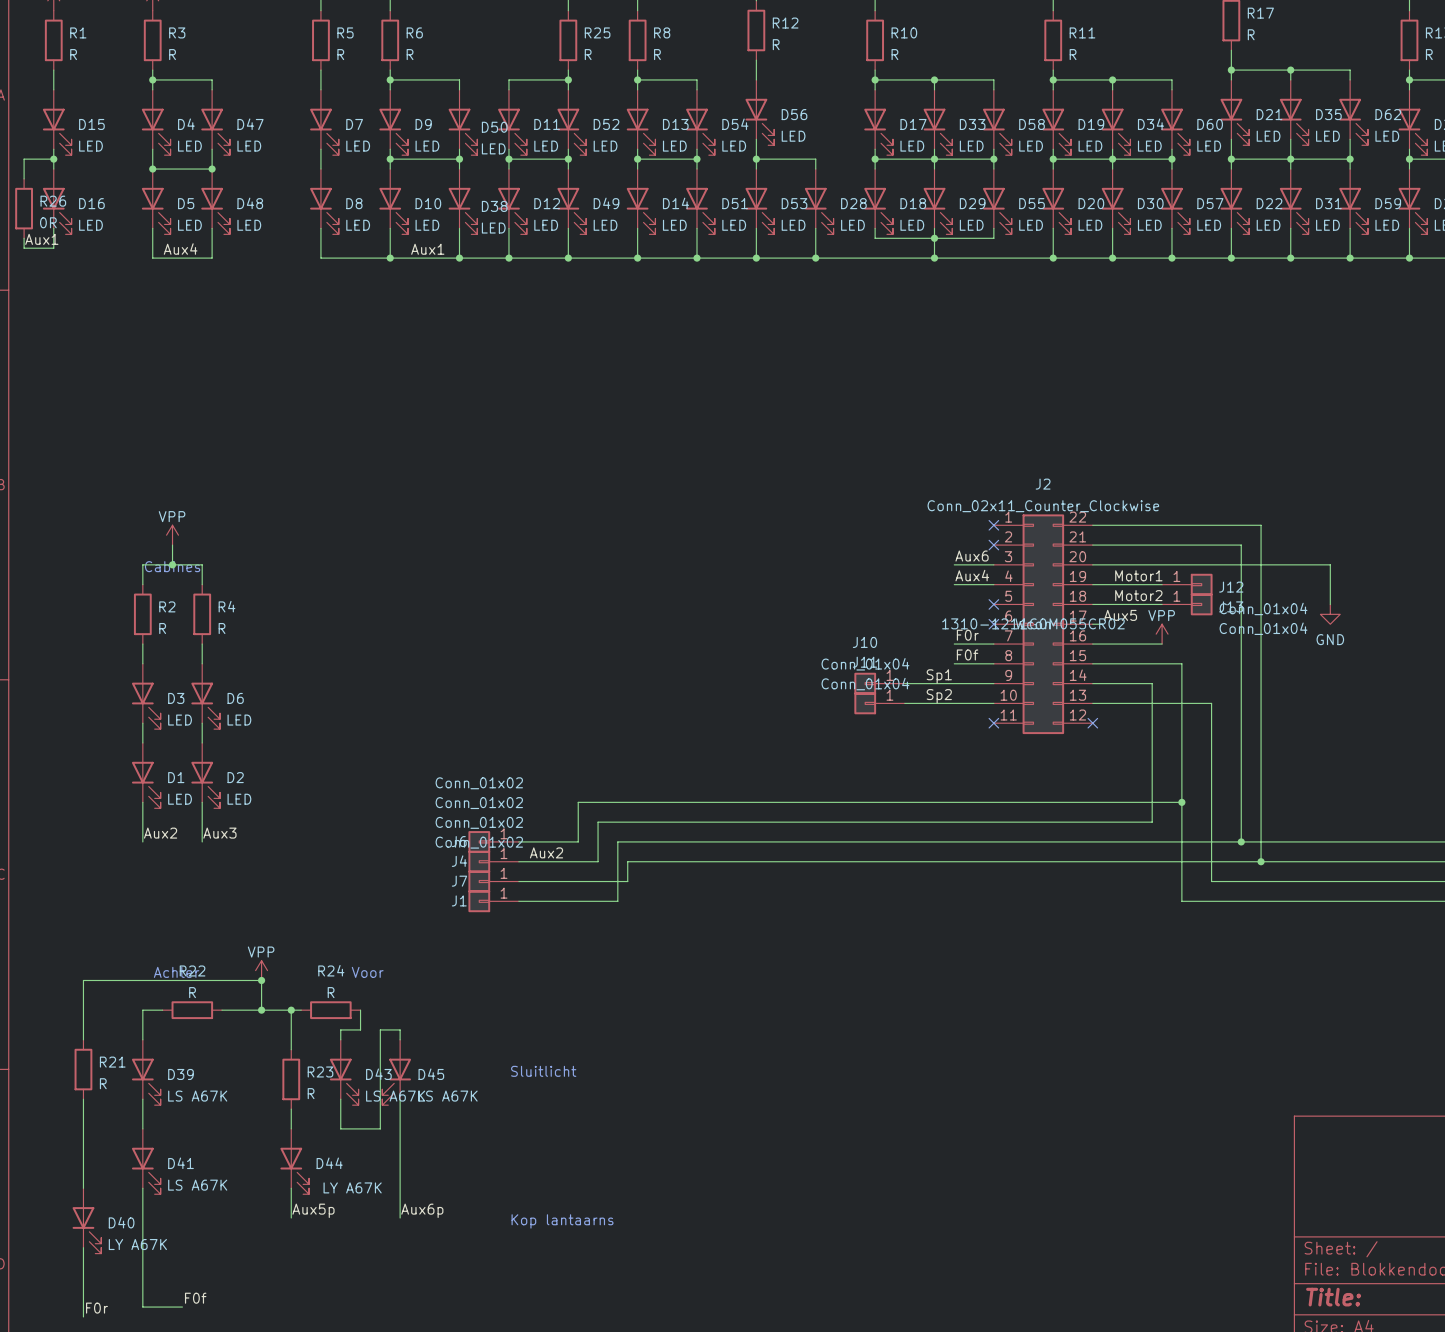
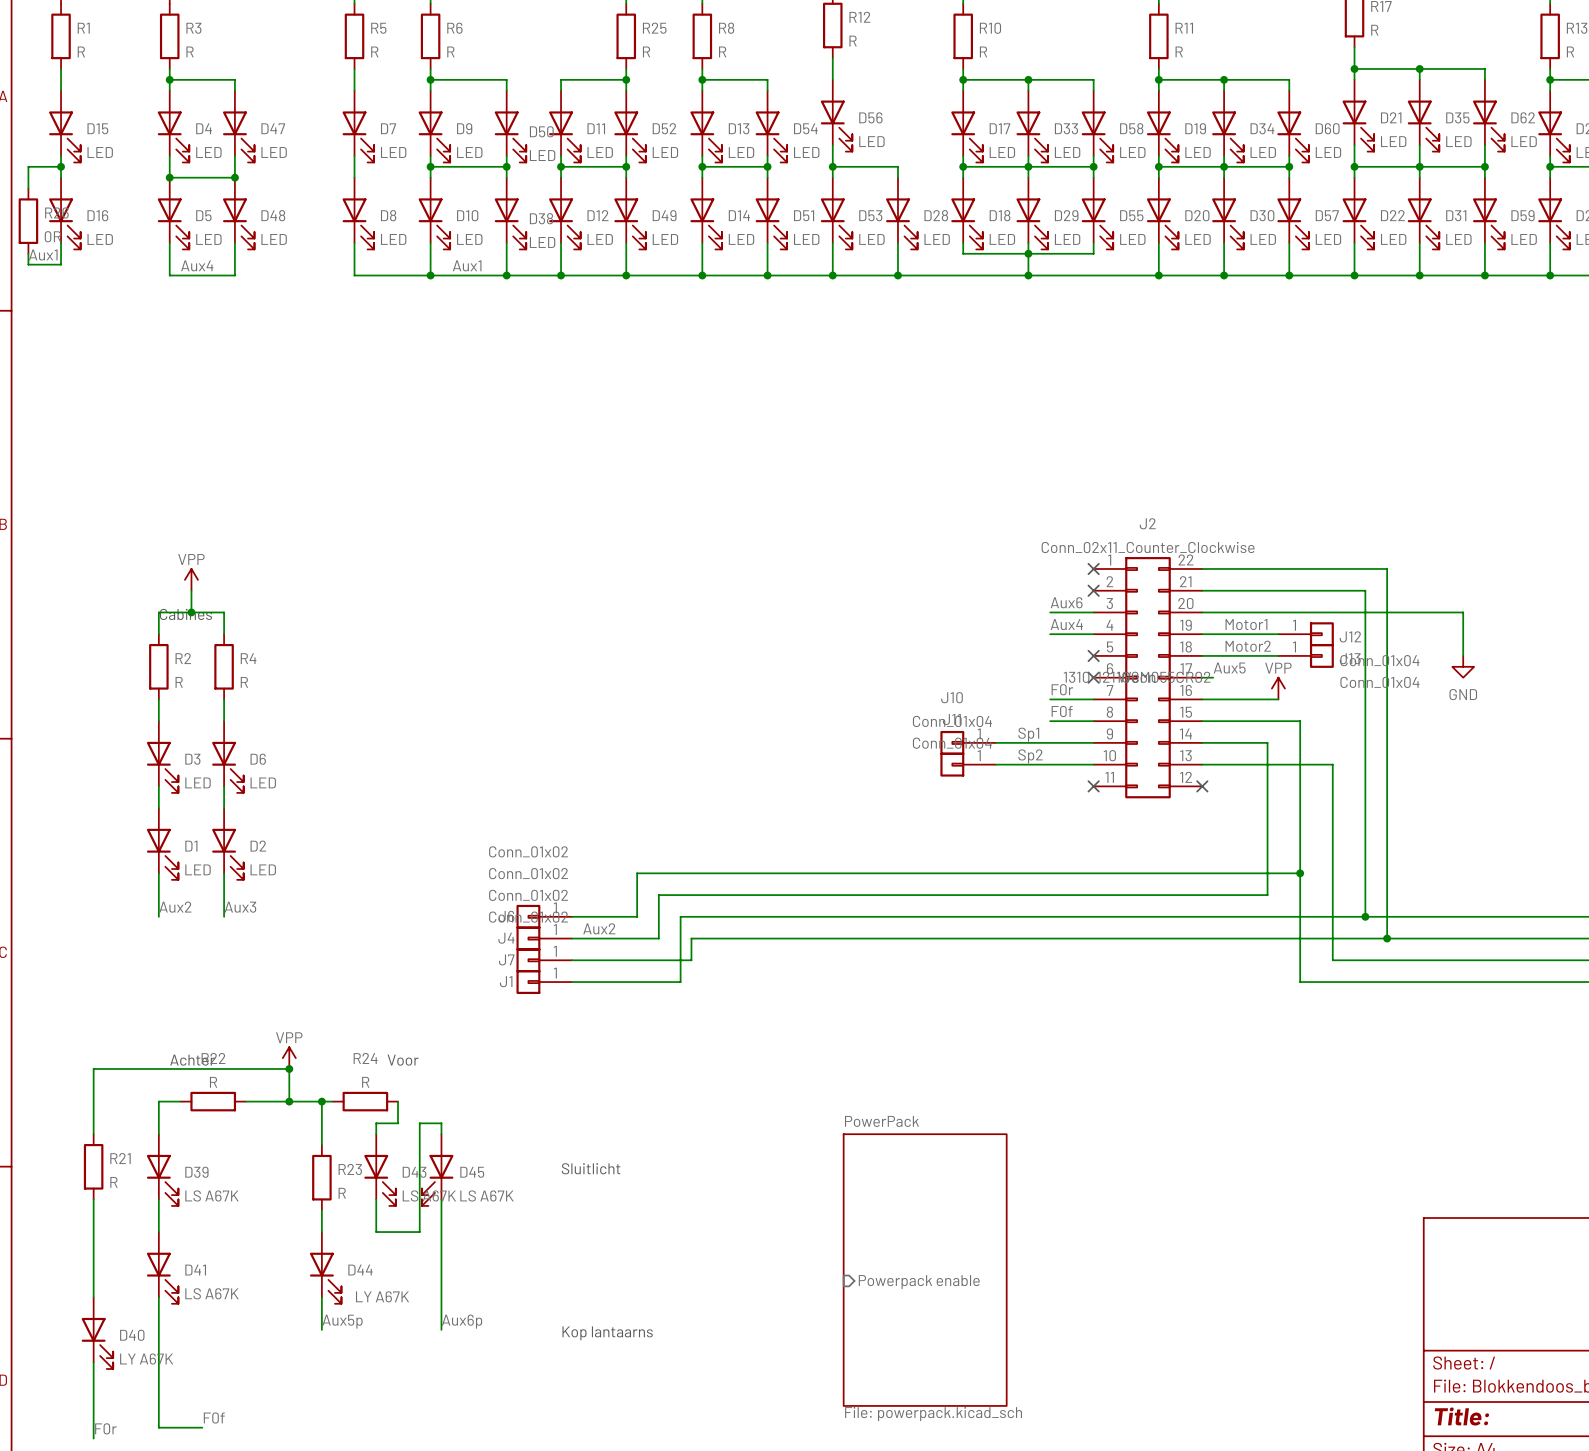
sheet PowerPack: none -> File: powerpack.kicad_sch (925, 1270)
sheet pin: none -> Powerpack enable (919, 1282)

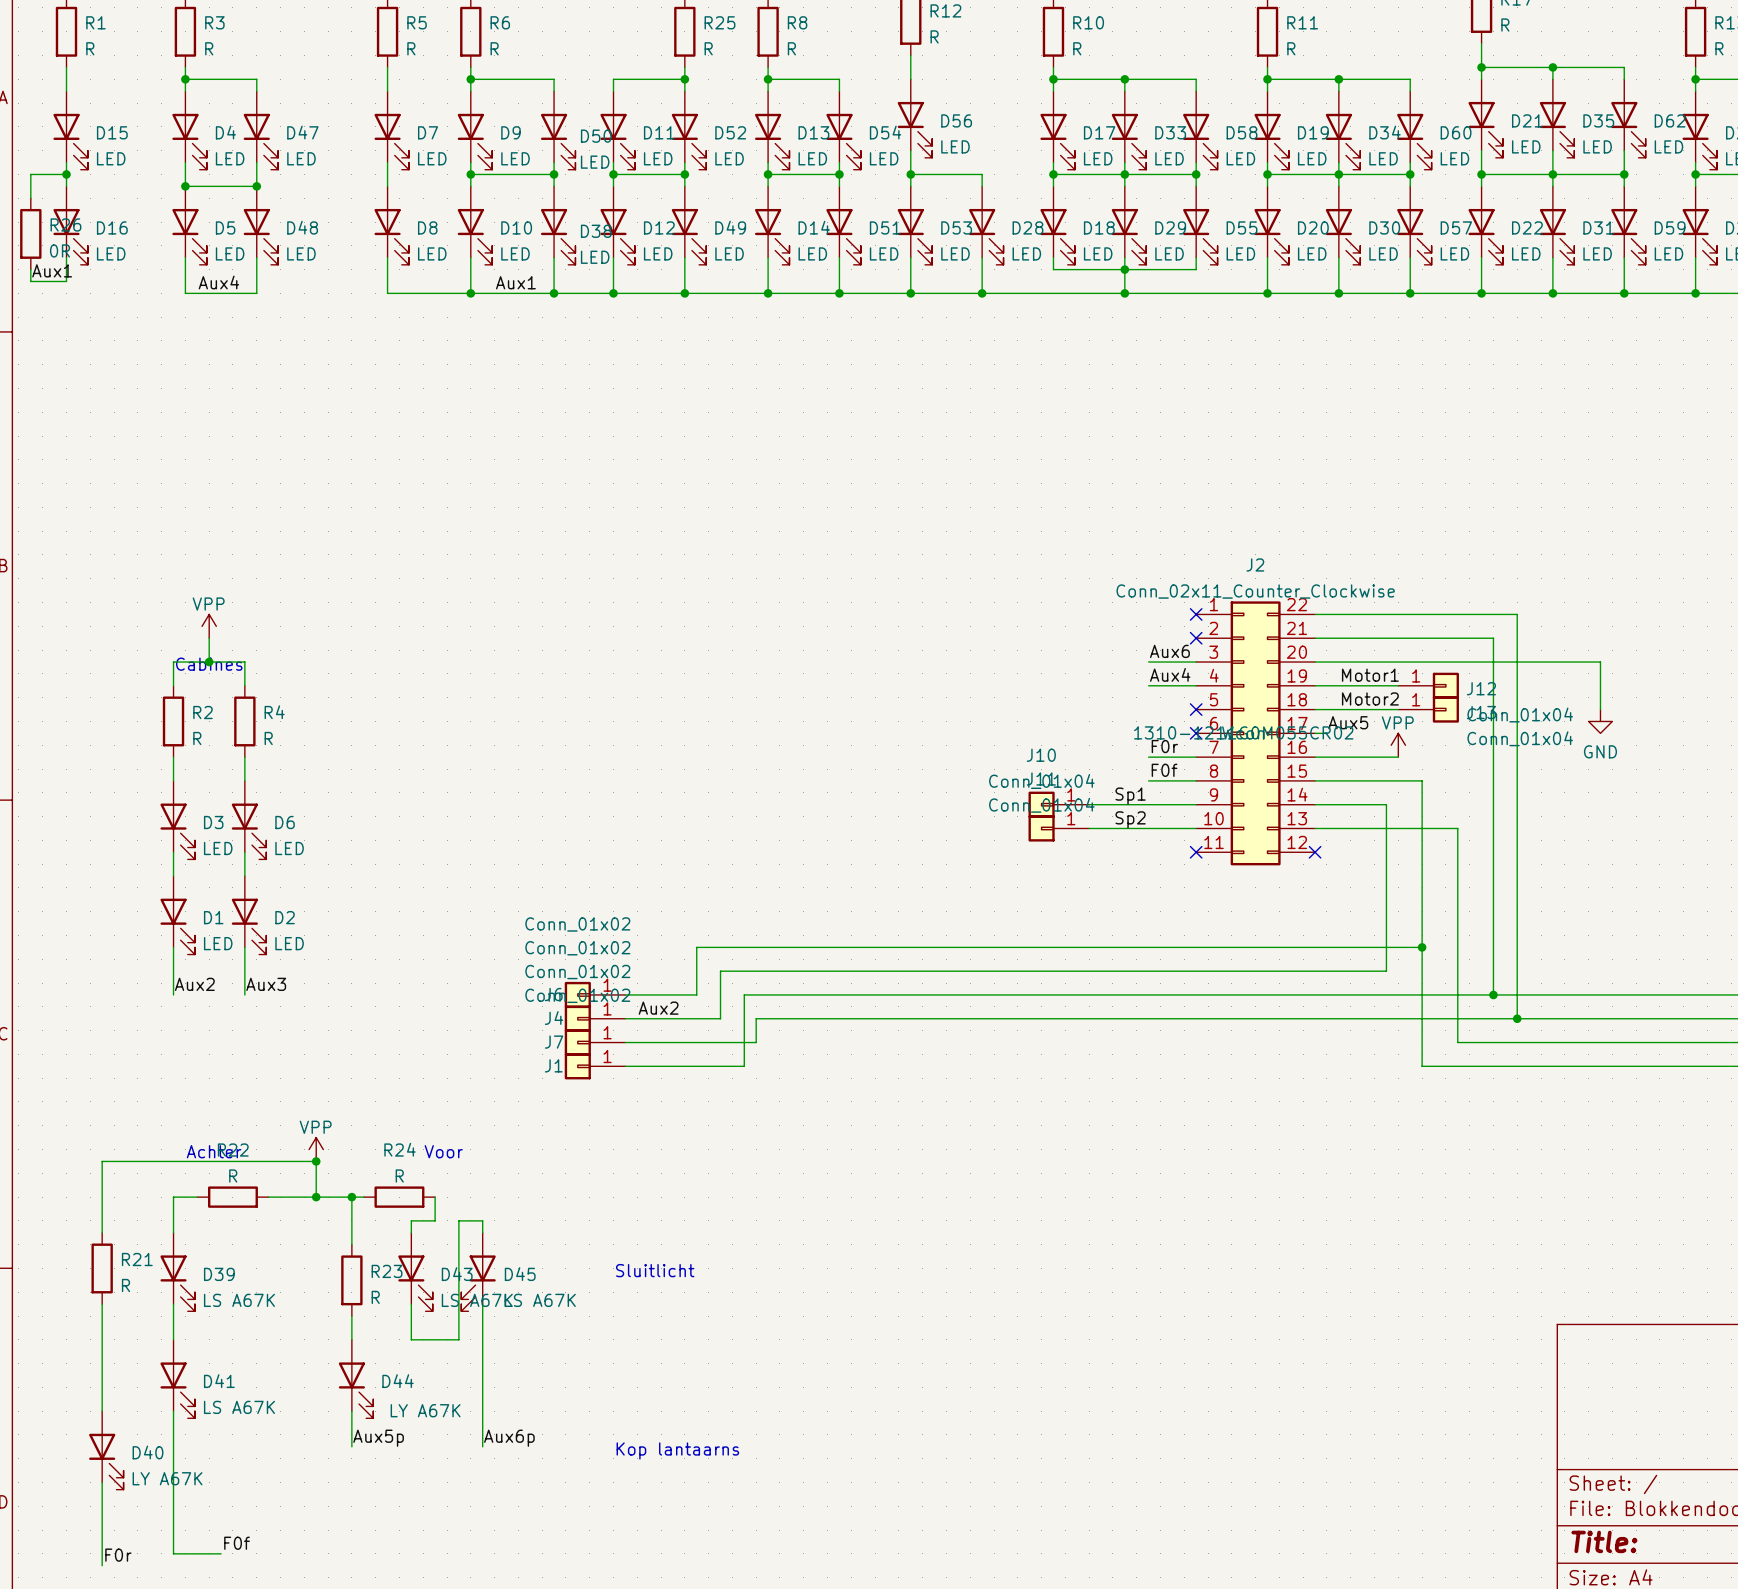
sheet PowerPack: File: powerpack.kicad_sch (925, 1270) -> none
sheet pin: Powerpack enable (919, 1282) -> none

